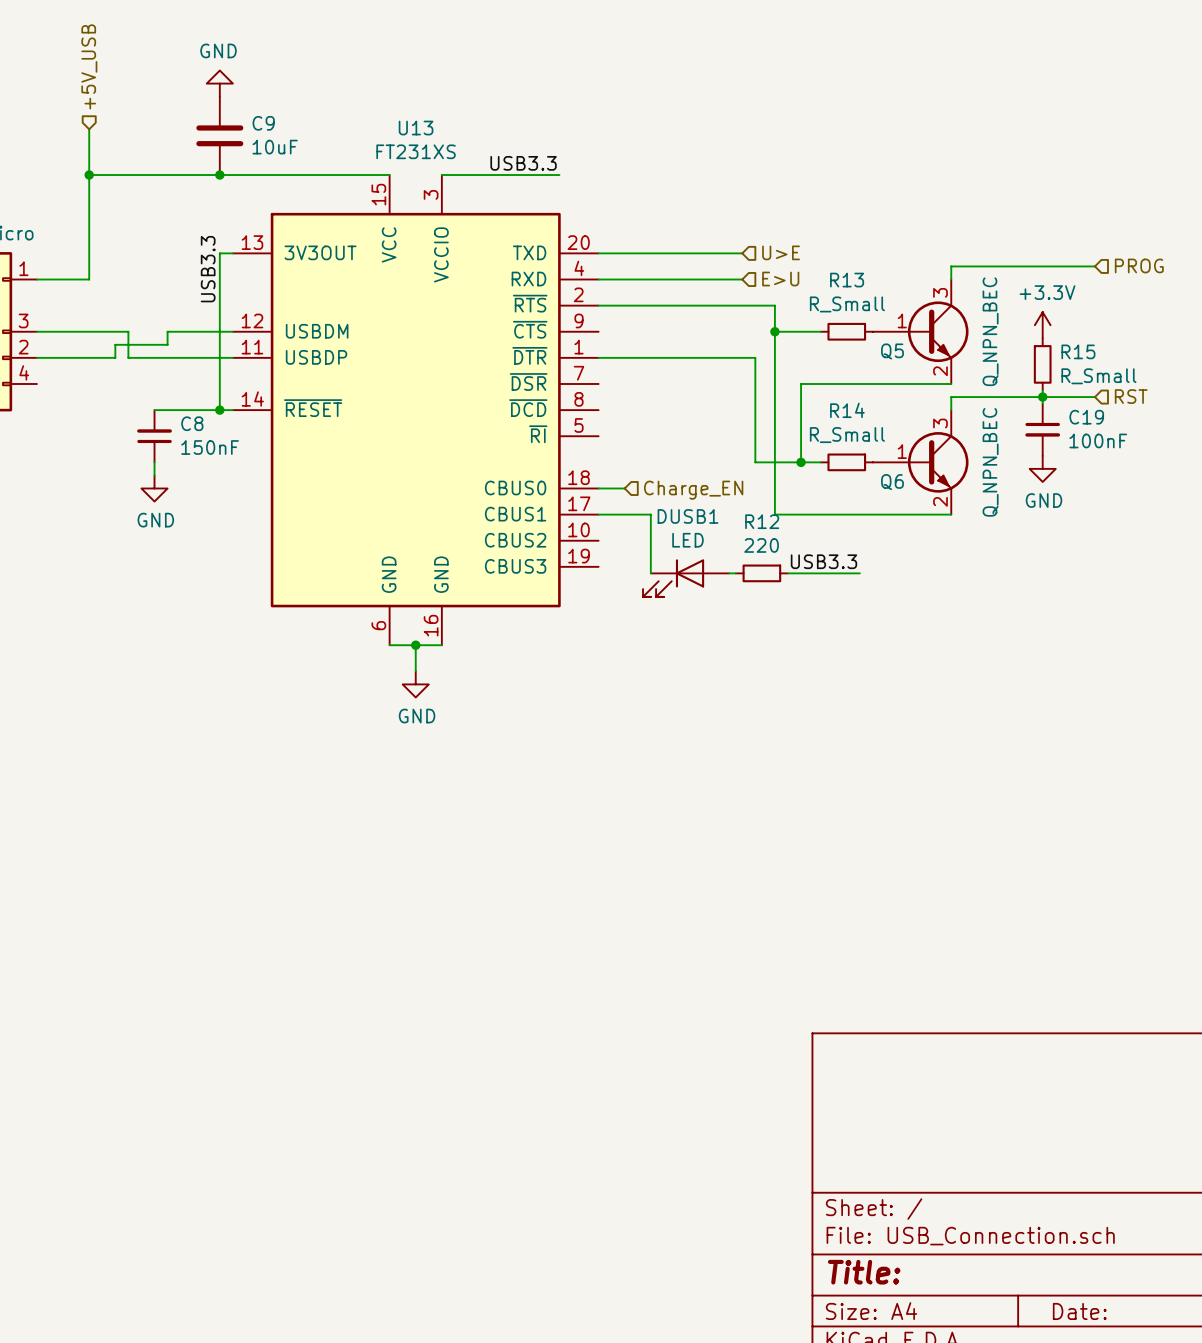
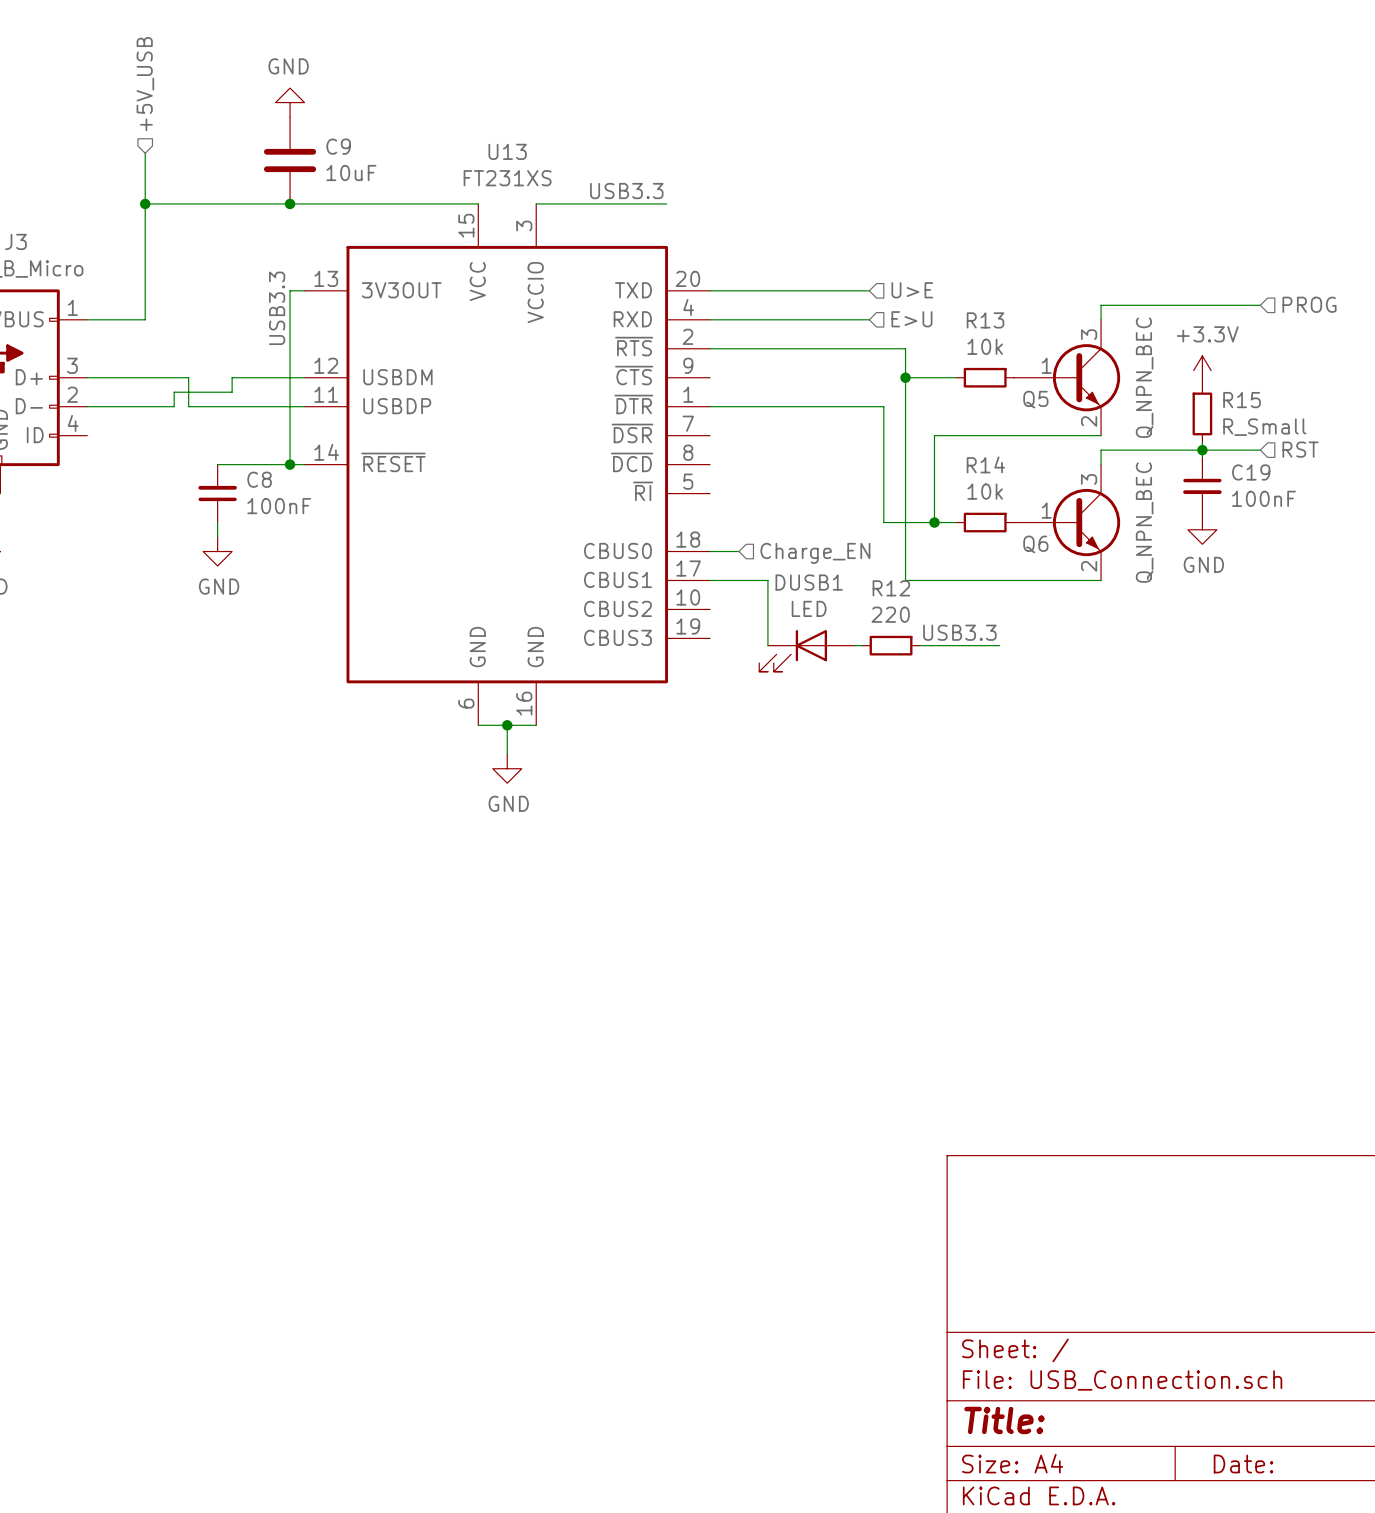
R13 value: R_Small (847, 304) -> 10k (985, 346)
R14 value: R_Small (847, 435) -> 10k (985, 491)
C8 value: 150nF (210, 447) -> 100nF (279, 506)

